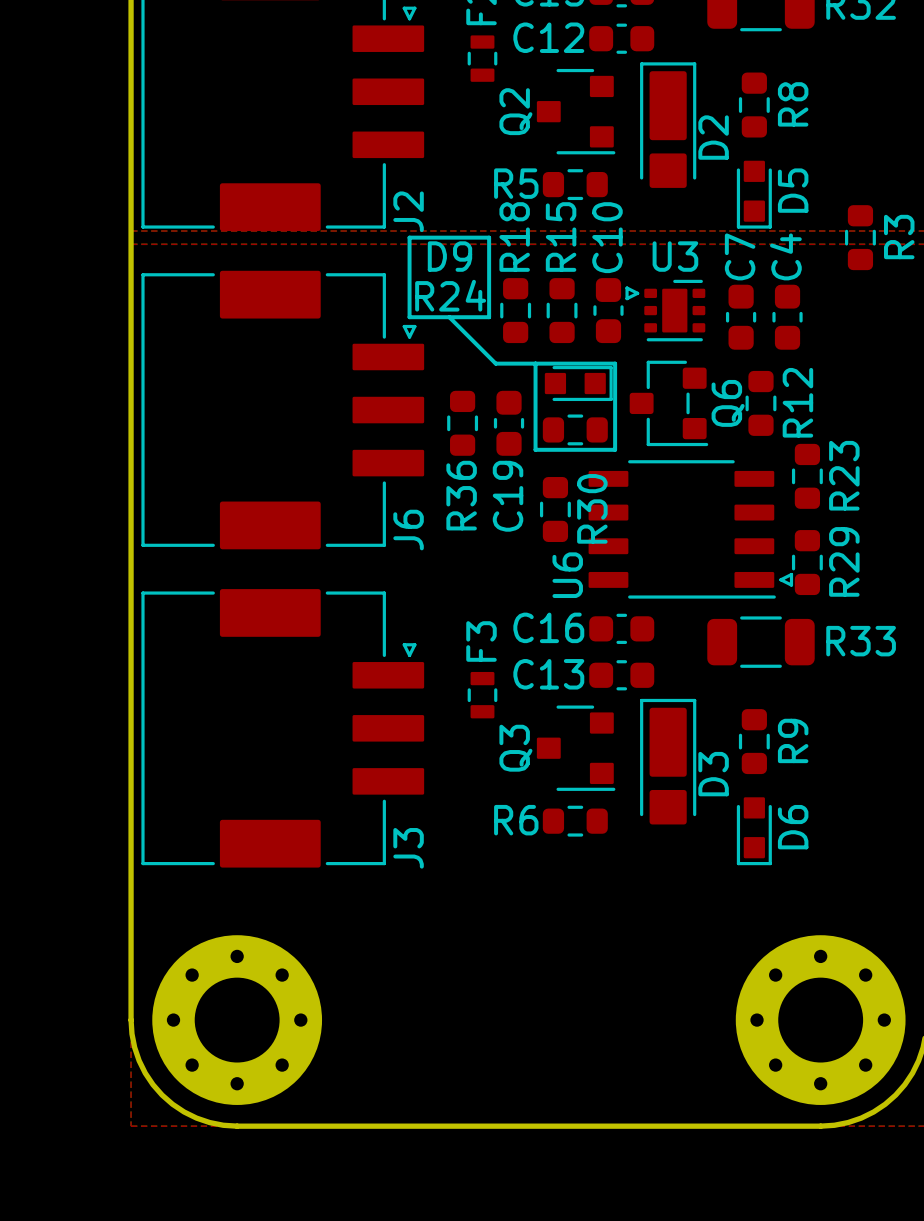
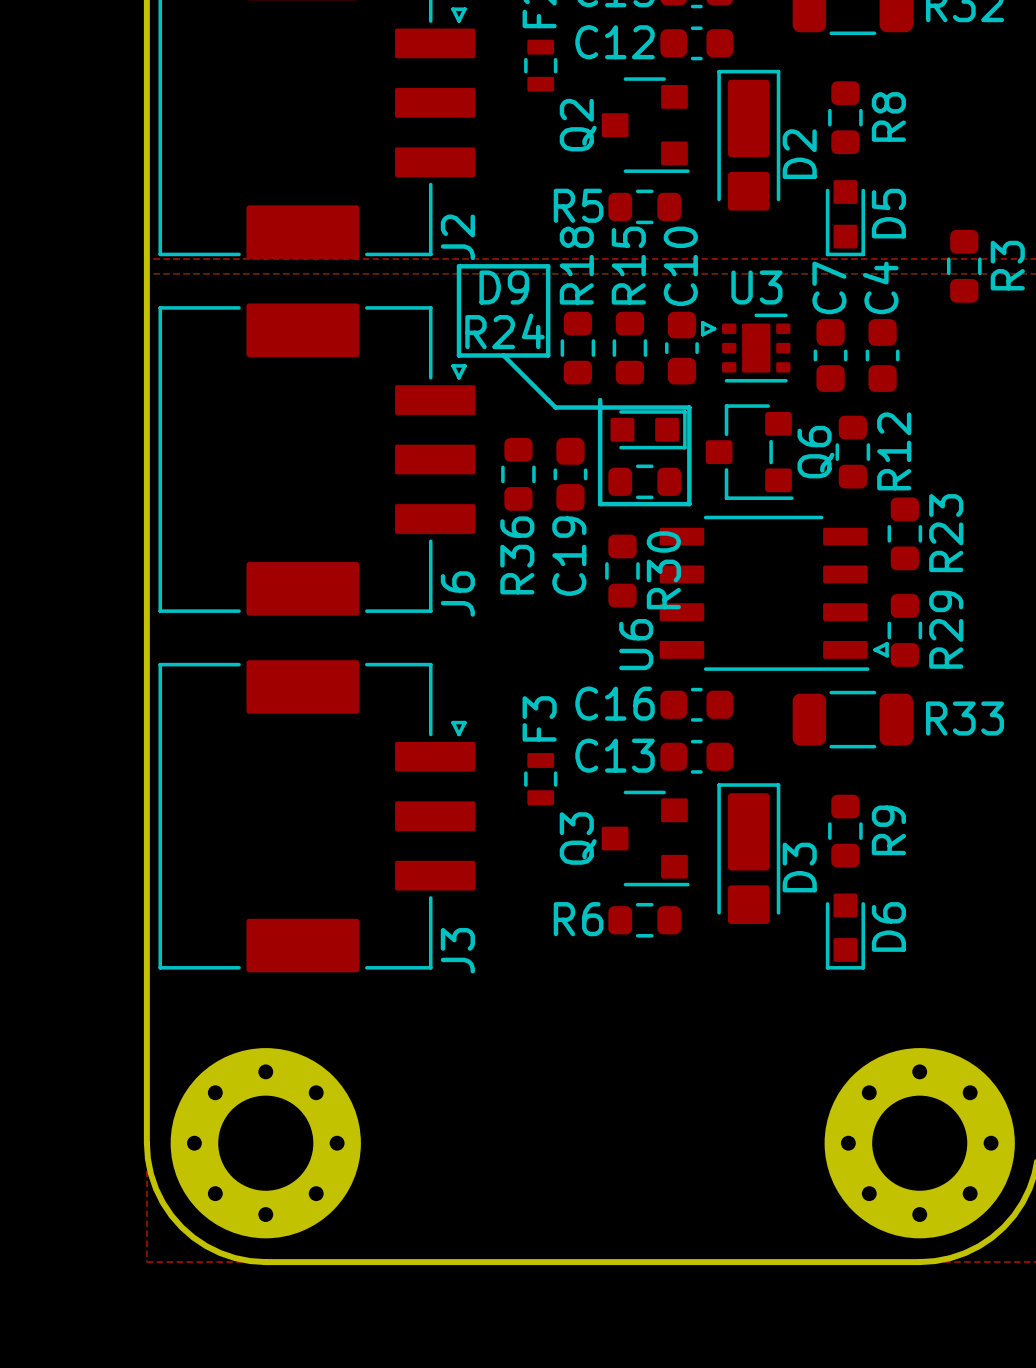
line: none -> (600, 400) (600, 407)

